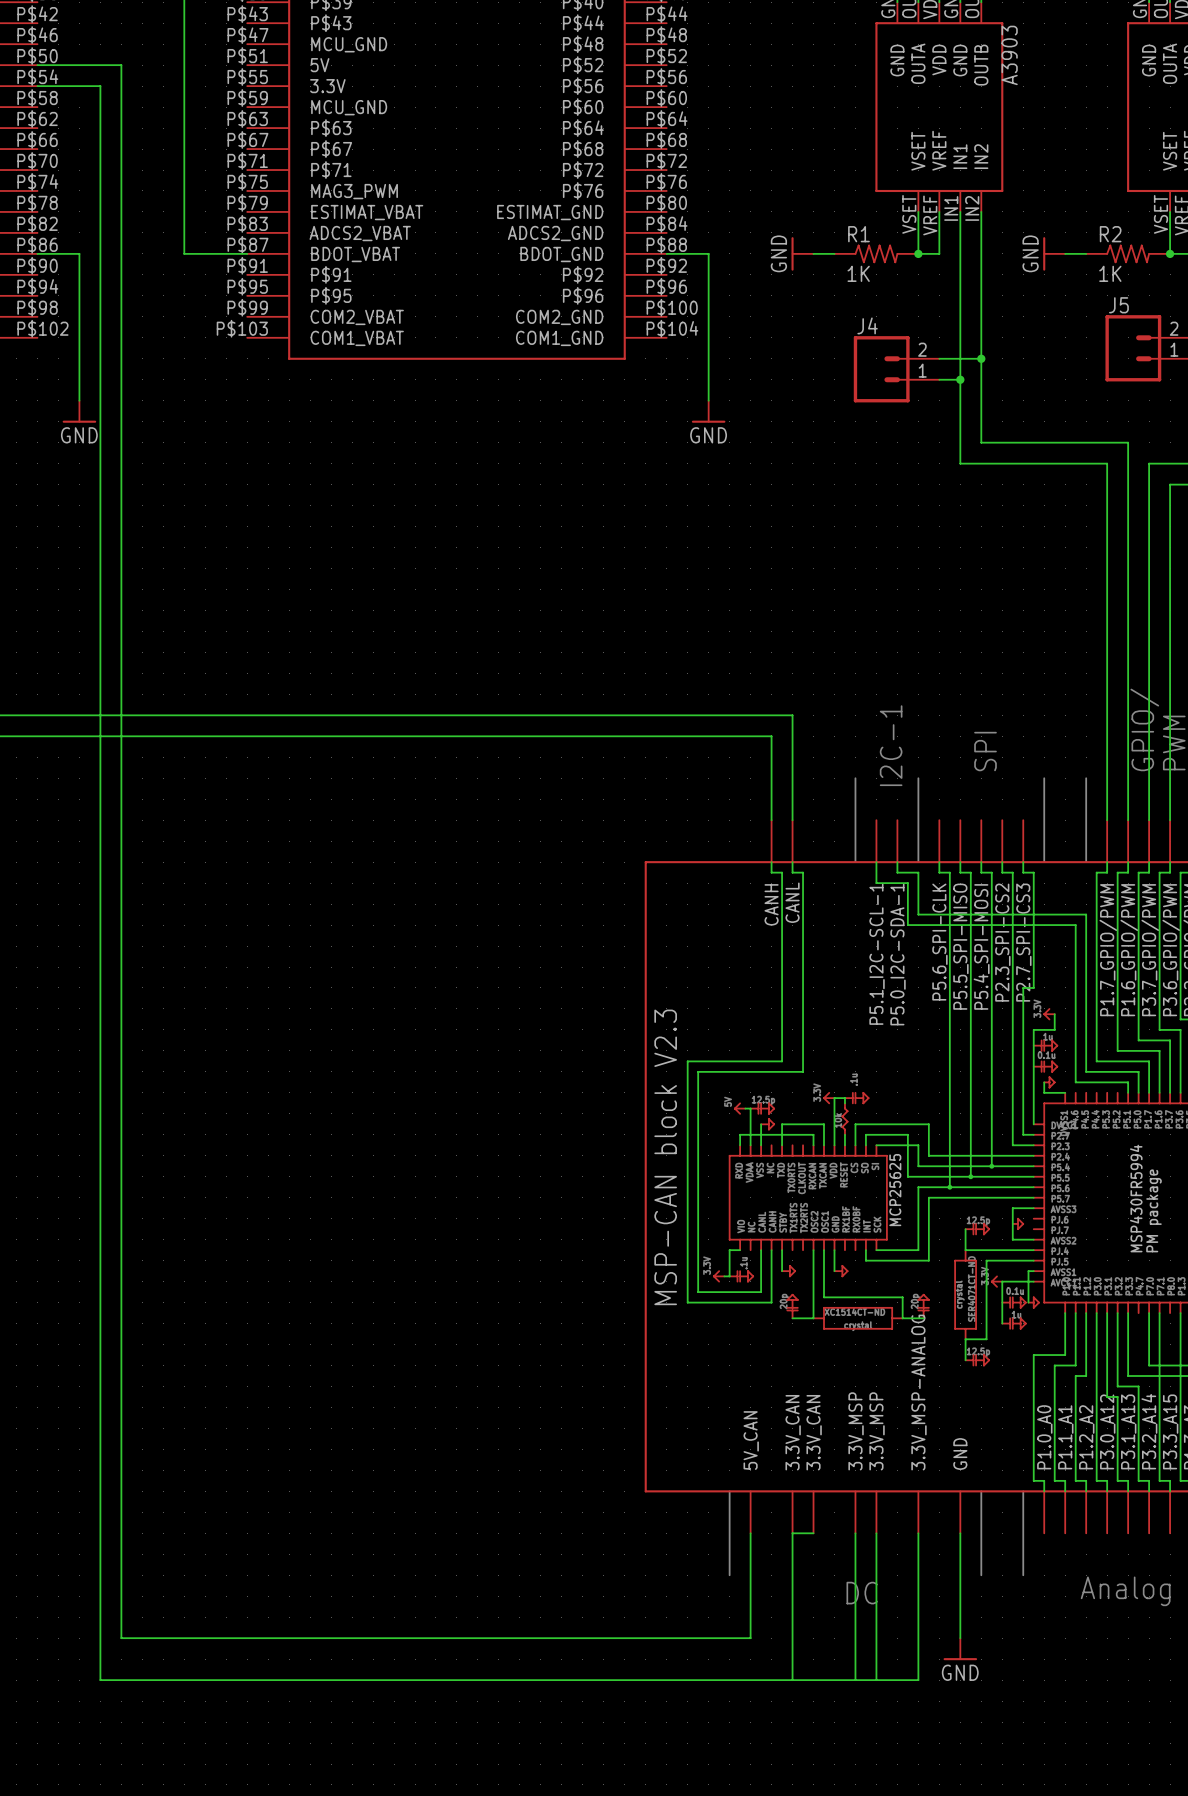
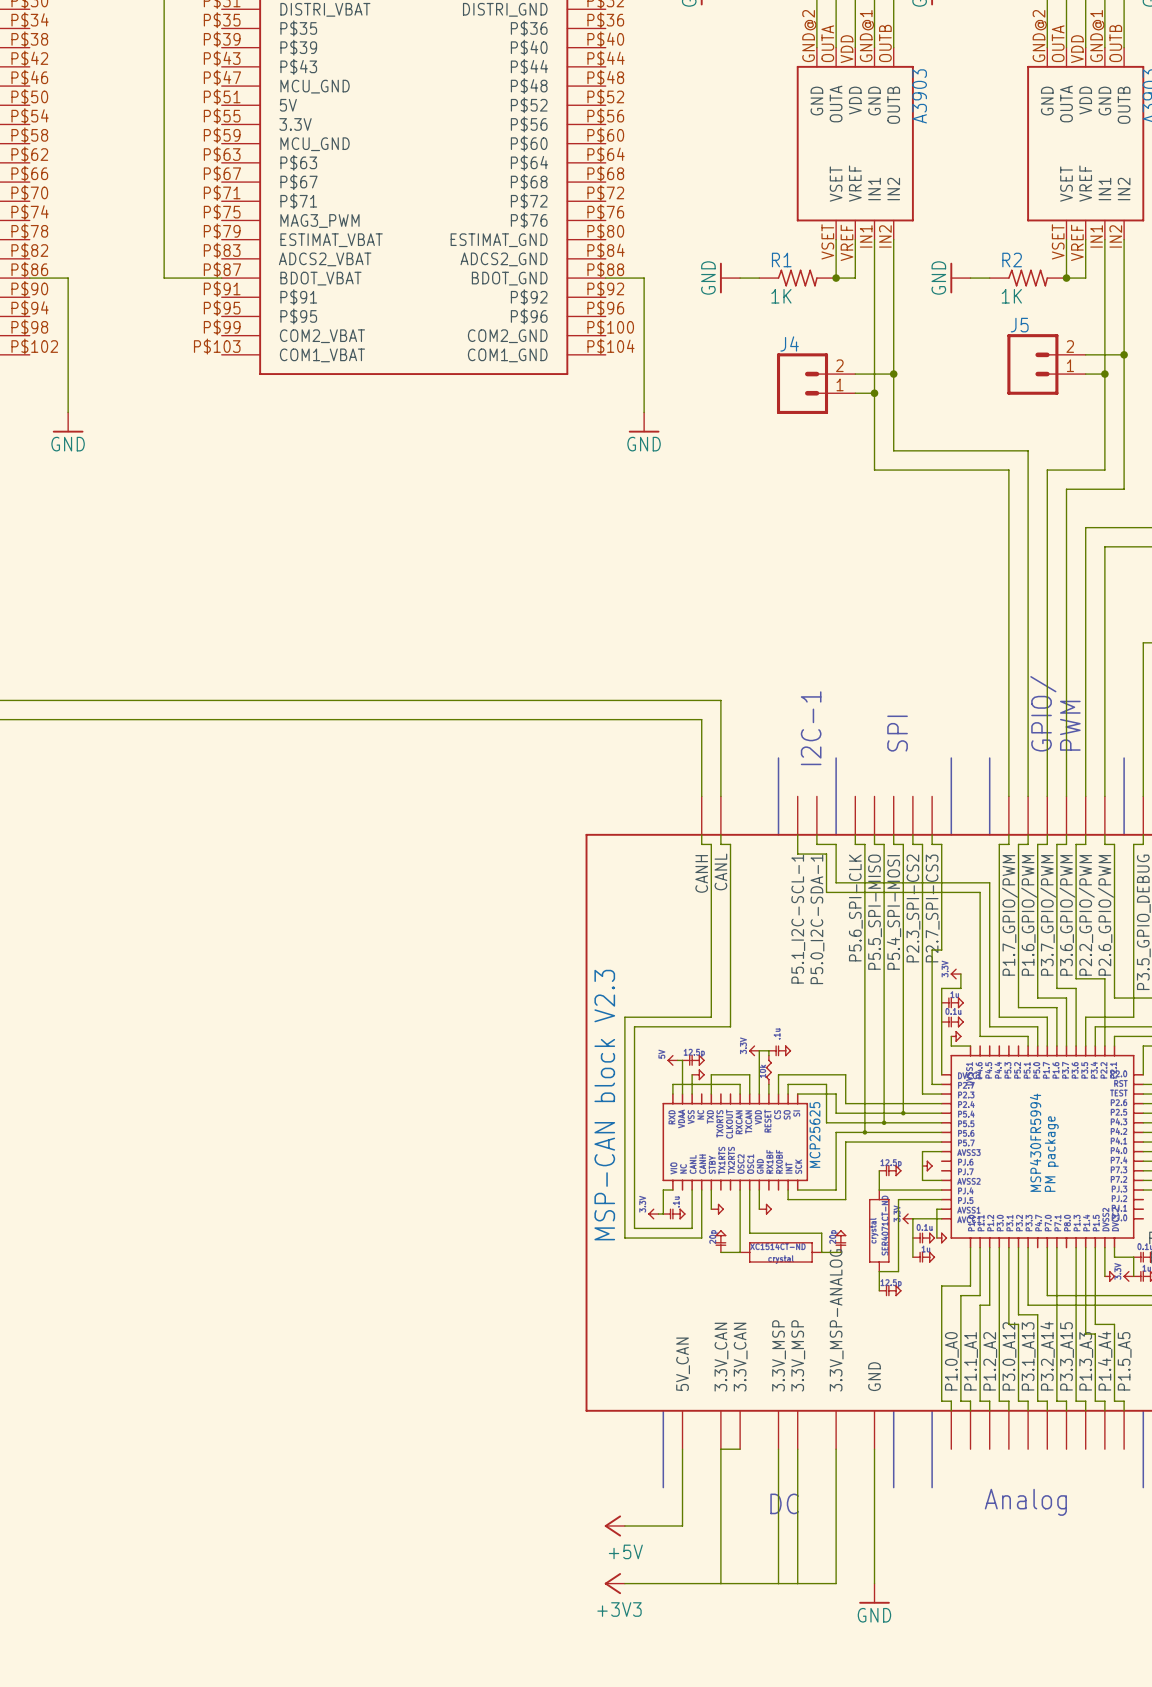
wire: (37, 65) (121, 65) (121, 1638) (750, 1638) (750, 1617) -> (624, 1525) (682, 1525)
wire: (37, 86) (100, 86) (100, 1680) (687, 1680) -> none
power symbol: none -> +5V (614, 1525)
power symbol position: GND (960, 1649) -> GND (874, 1593)
power symbol: none -> +3V3 (614, 1583)

